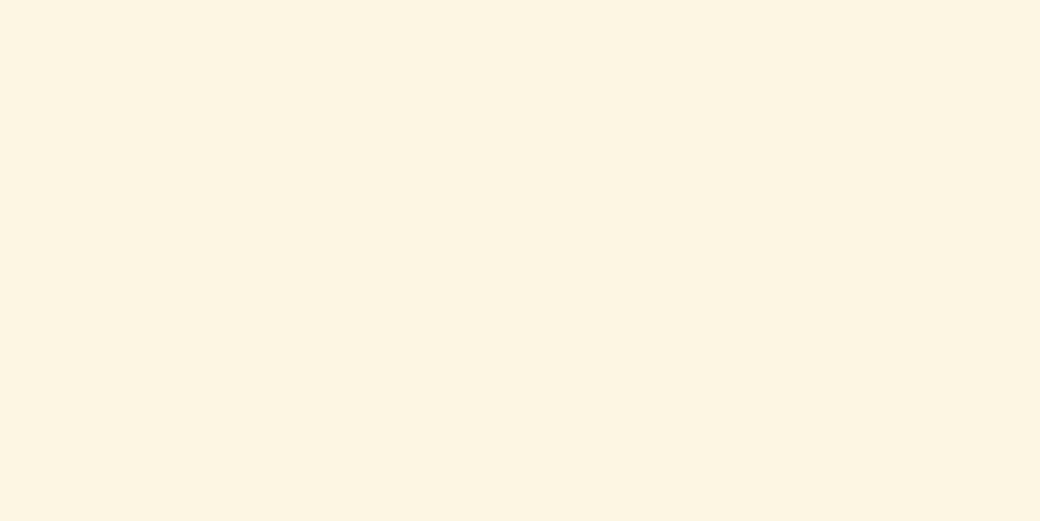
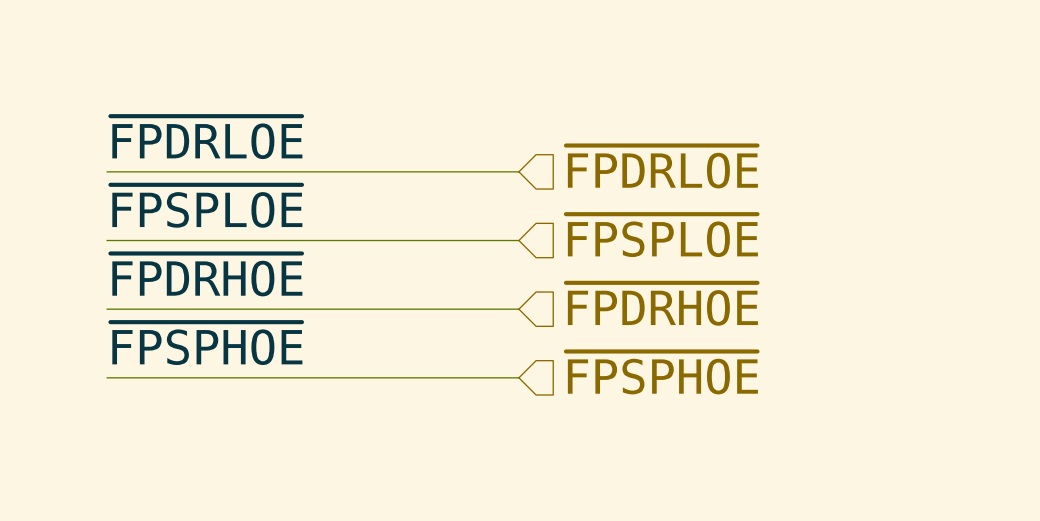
label: none -> ~{FPDRLOE} (206, 137)
hierarchical label: none -> ~{FPDRLOE} (661, 166)
wire: none -> (106, 171) (518, 171)
label: none -> ~{FPSPLOE} (206, 206)
hierarchical label: none -> ~{FPSPLOE} (661, 235)
wire: none -> (106, 240) (518, 240)
label: none -> ~{FPDRHOE} (206, 274)
hierarchical label: none -> ~{FPDRHOE} (661, 304)
wire: none -> (106, 309) (518, 309)
label: none -> ~{FPSPHOE} (206, 343)
hierarchical label: none -> ~{FPSPHOE} (661, 372)
wire: none -> (106, 377) (518, 377)

